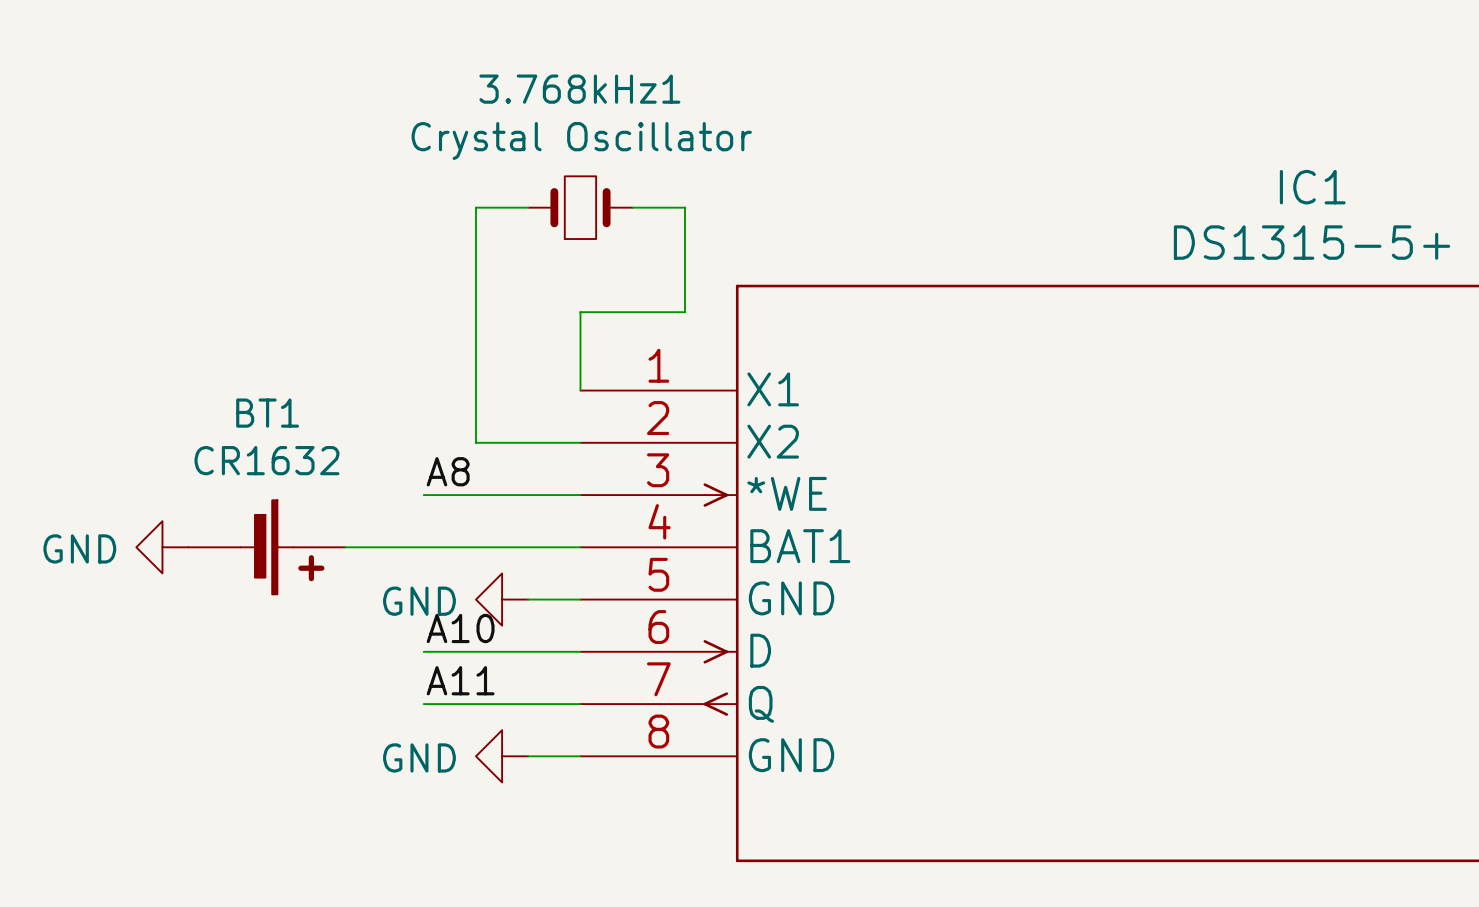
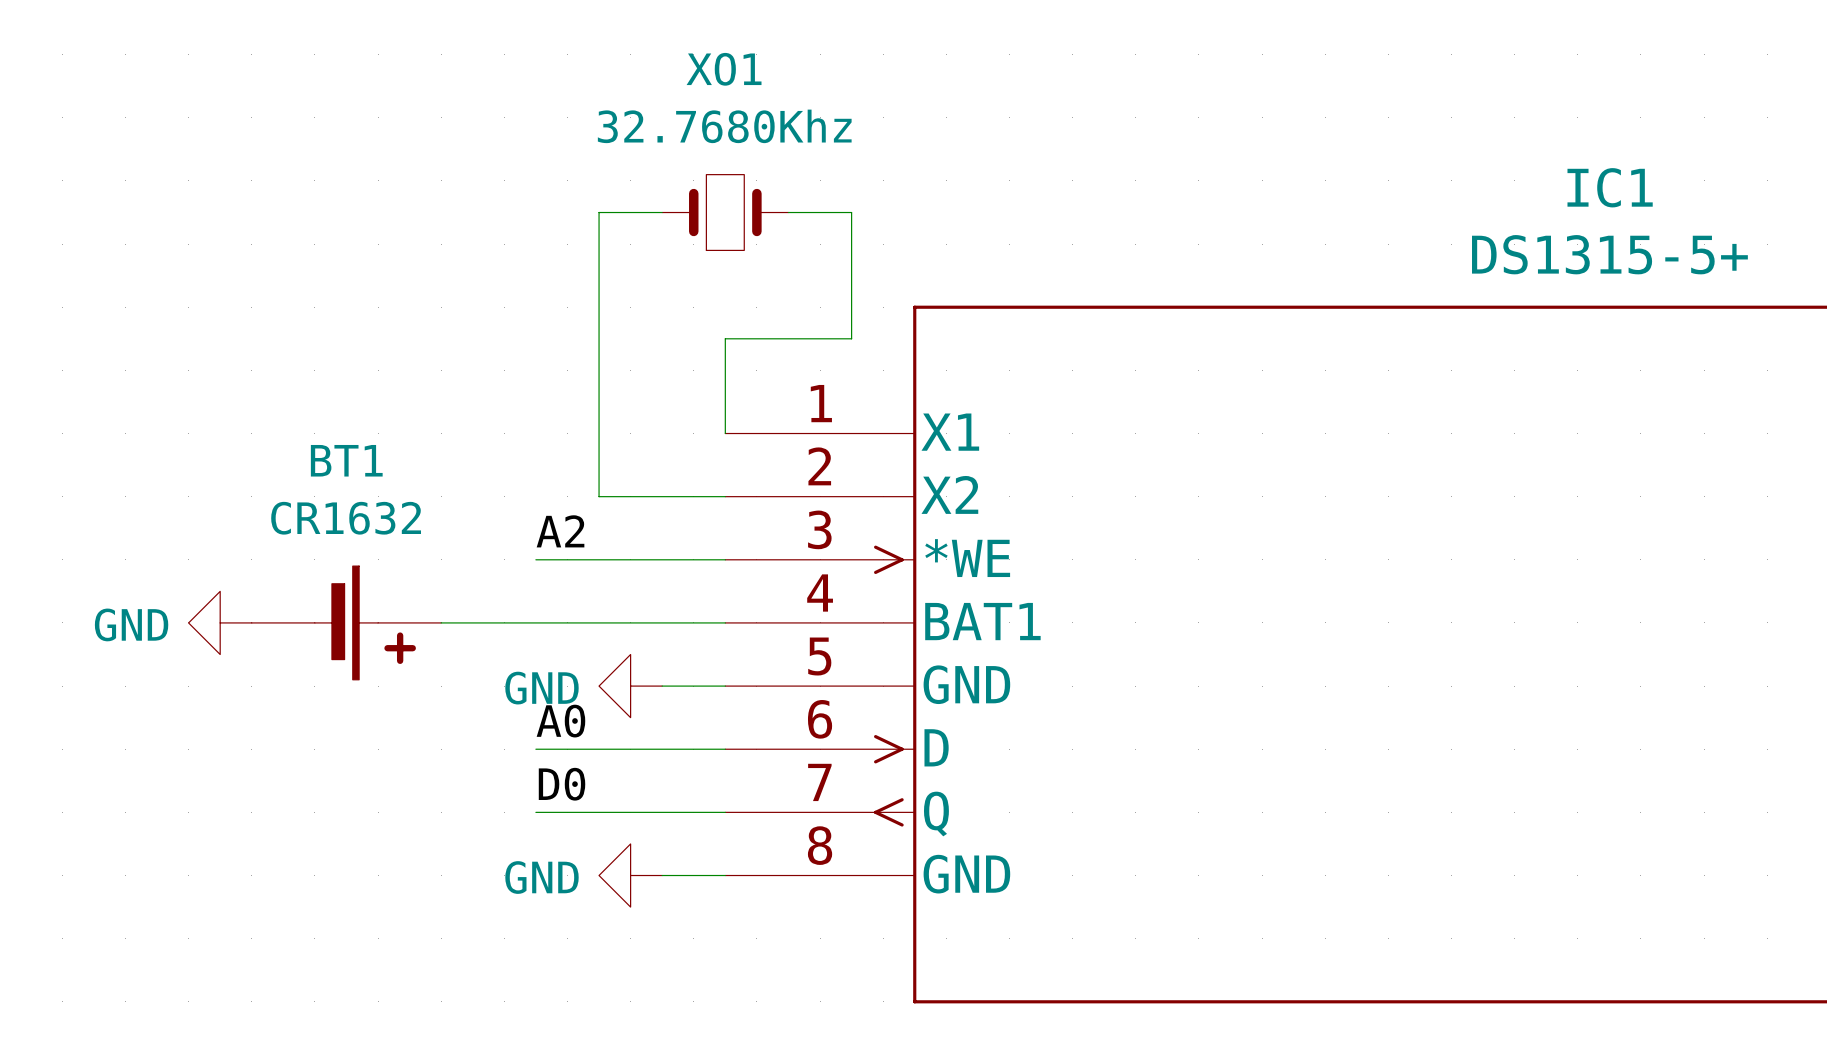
3.768kHz1 name: 3.768kHz1 (579, 89) -> XO1 (724, 69)
3.768kHz1 value: Crystal Oscillator (581, 141) -> 32.7680Khz (724, 126)
label: A8 (448, 471) -> A2 (560, 531)
label: A10 (460, 628) -> A0 (560, 721)
label: A11 (460, 680) -> D0 (562, 784)

